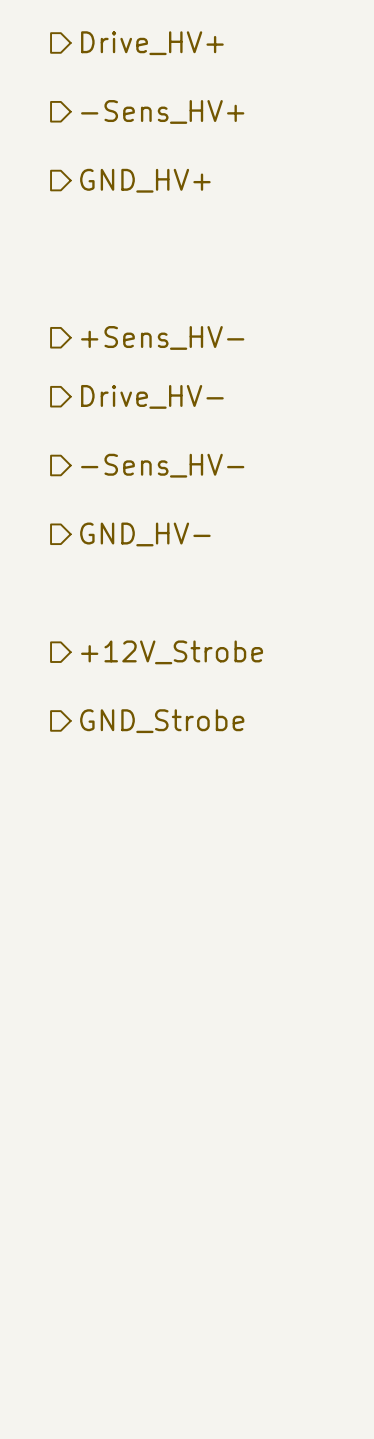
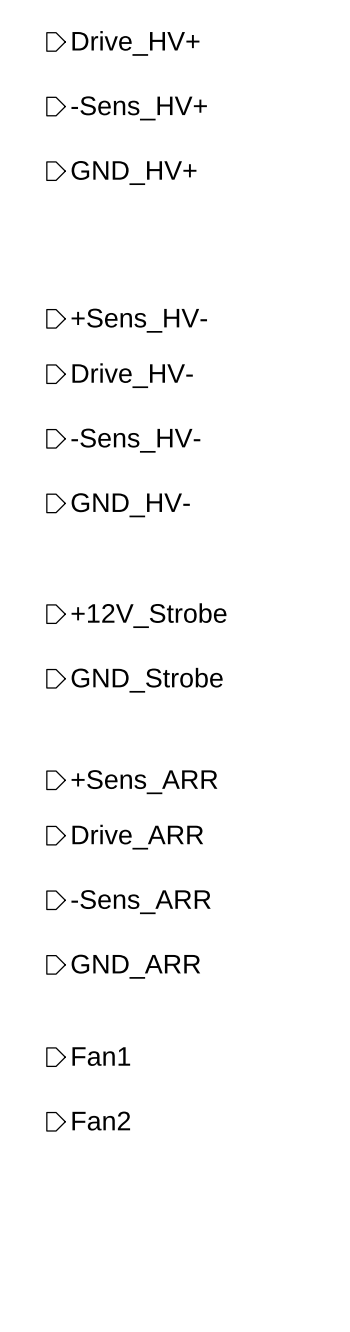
hierarchical label: none -> +Sens_ARR (144, 782)
hierarchical label: none -> Drive_ARR (137, 837)
hierarchical label: none -> -Sens_ARR (141, 902)
hierarchical label: none -> GND_ARR (135, 966)
hierarchical label: none -> Fan1 (101, 1056)
hierarchical label: none -> Fan2 (101, 1121)

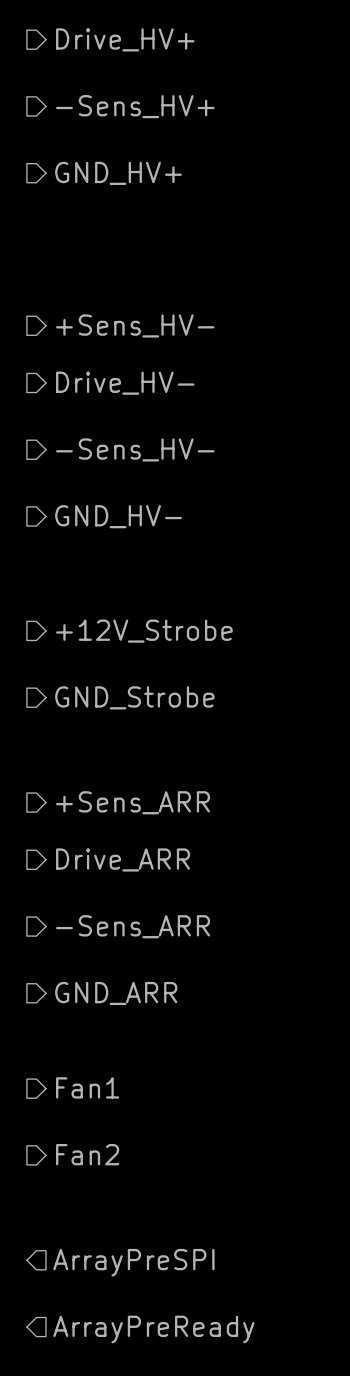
hierarchical label: none -> ArrayPreSPI (133, 1262)
hierarchical label: none -> ArrayPreReady (153, 1329)

